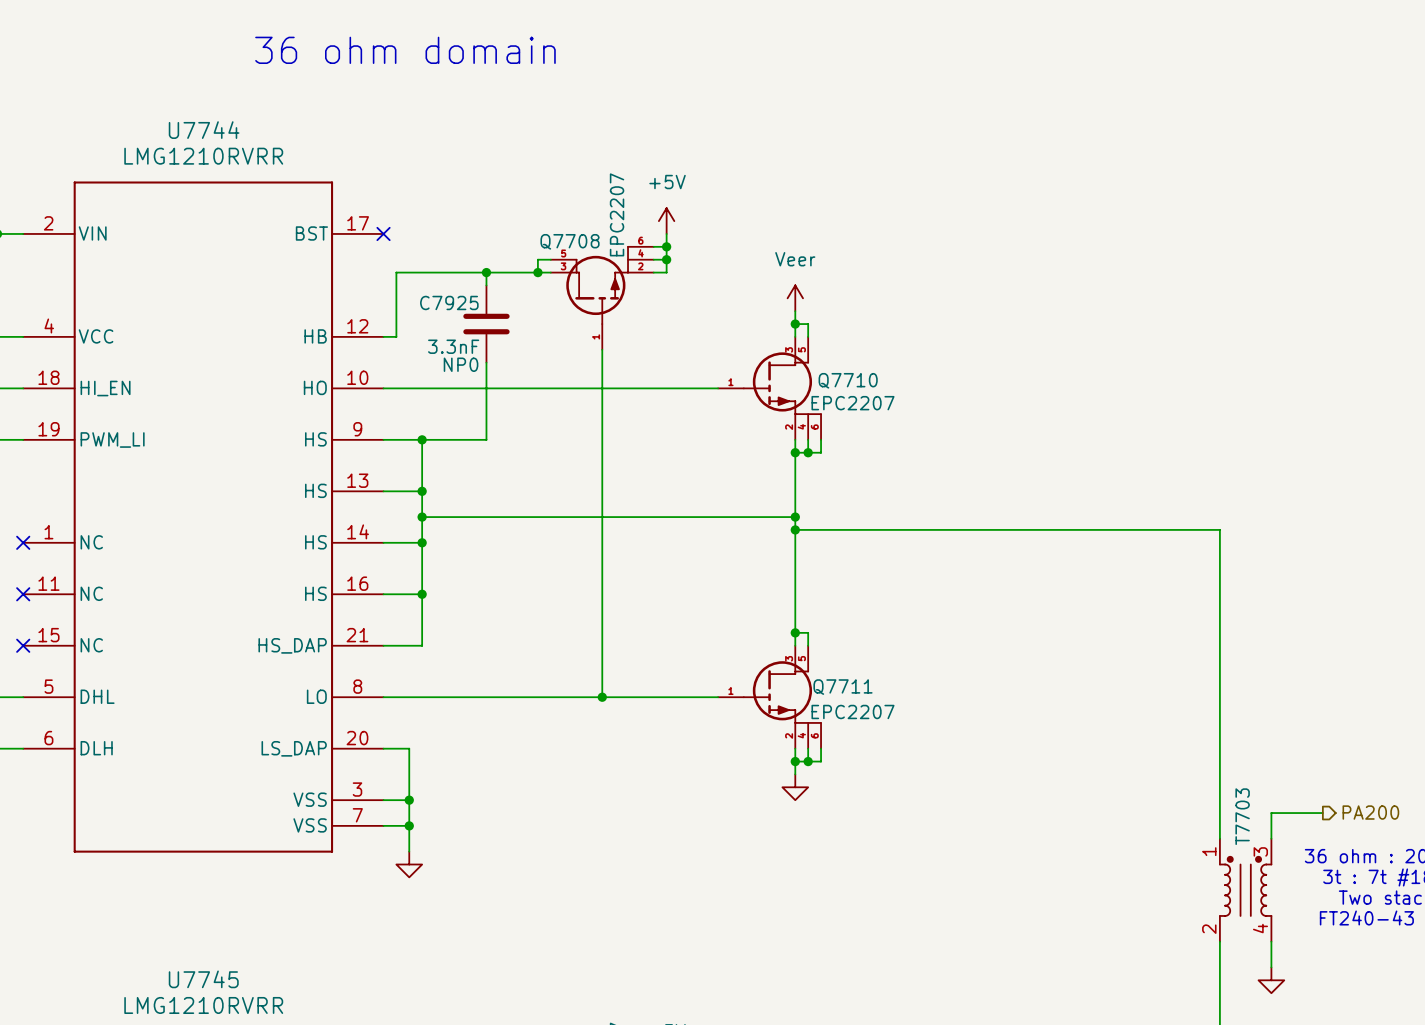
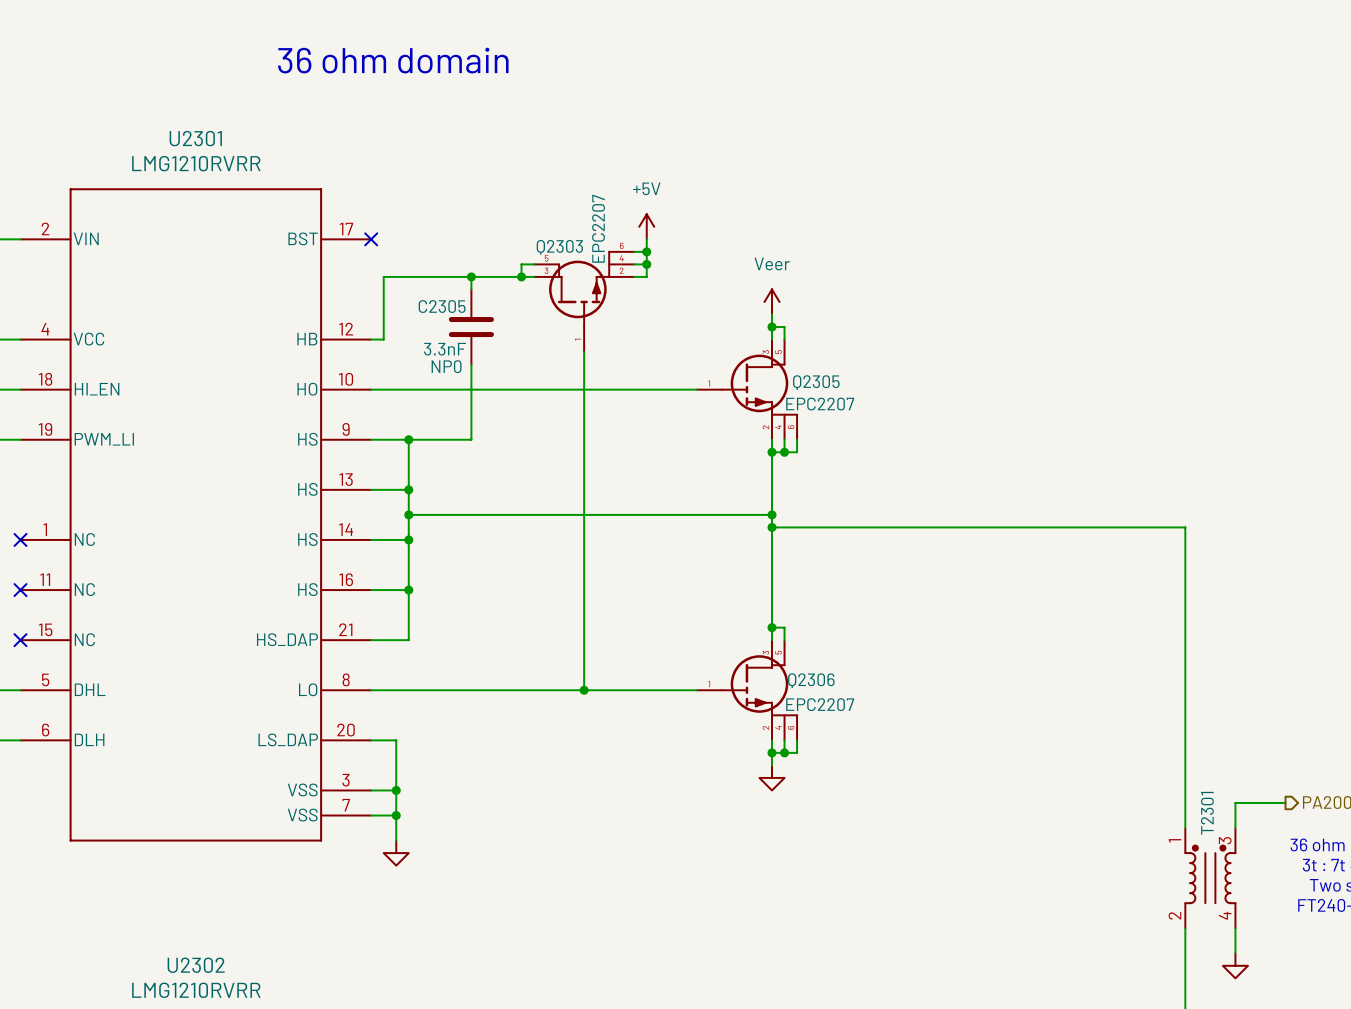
U7744 name: U7744 (204, 130) -> U2301 (195, 138)
Q7708 name: Q7708 (570, 241) -> Q2303 (559, 247)
C7925 name: C7925 (449, 302) -> C2305 (442, 306)
Q7710 name: Q7710 (848, 380) -> Q2305 (816, 382)
Q7711 name: Q7711 (843, 687) -> Q2306 (811, 680)
T7703 name: T7703 (1242, 816) -> T2301 (1207, 813)
U7745 name: U7745 (203, 979) -> U2302 (196, 965)

